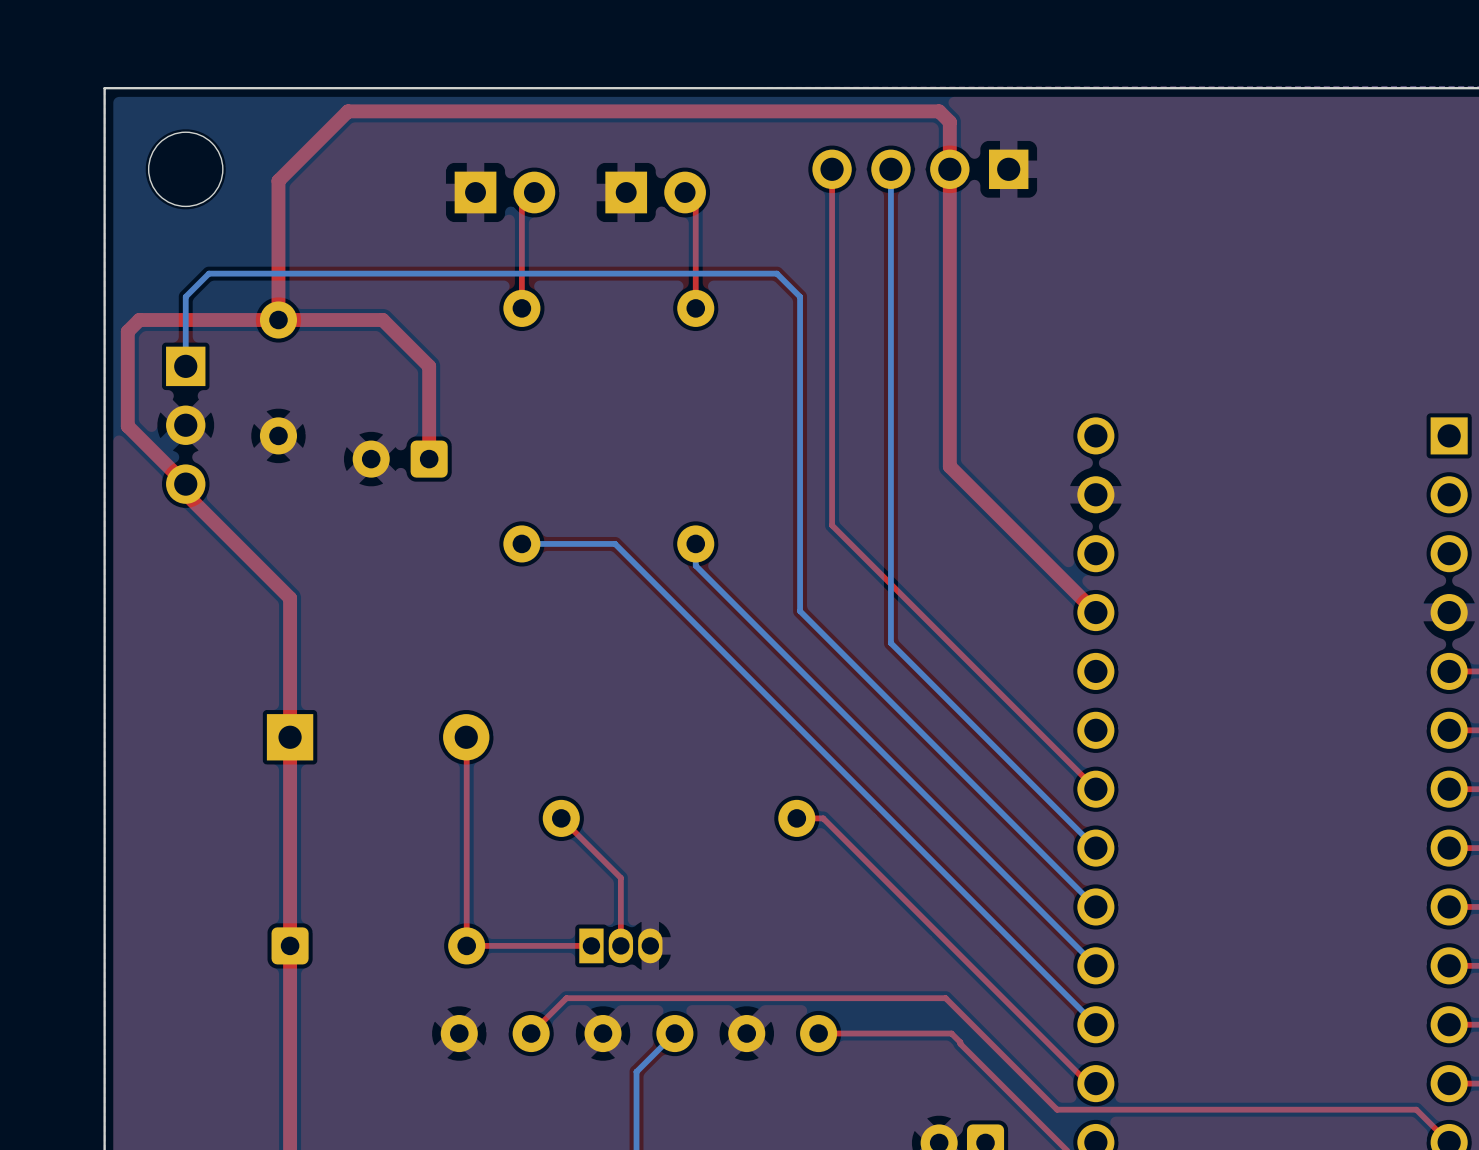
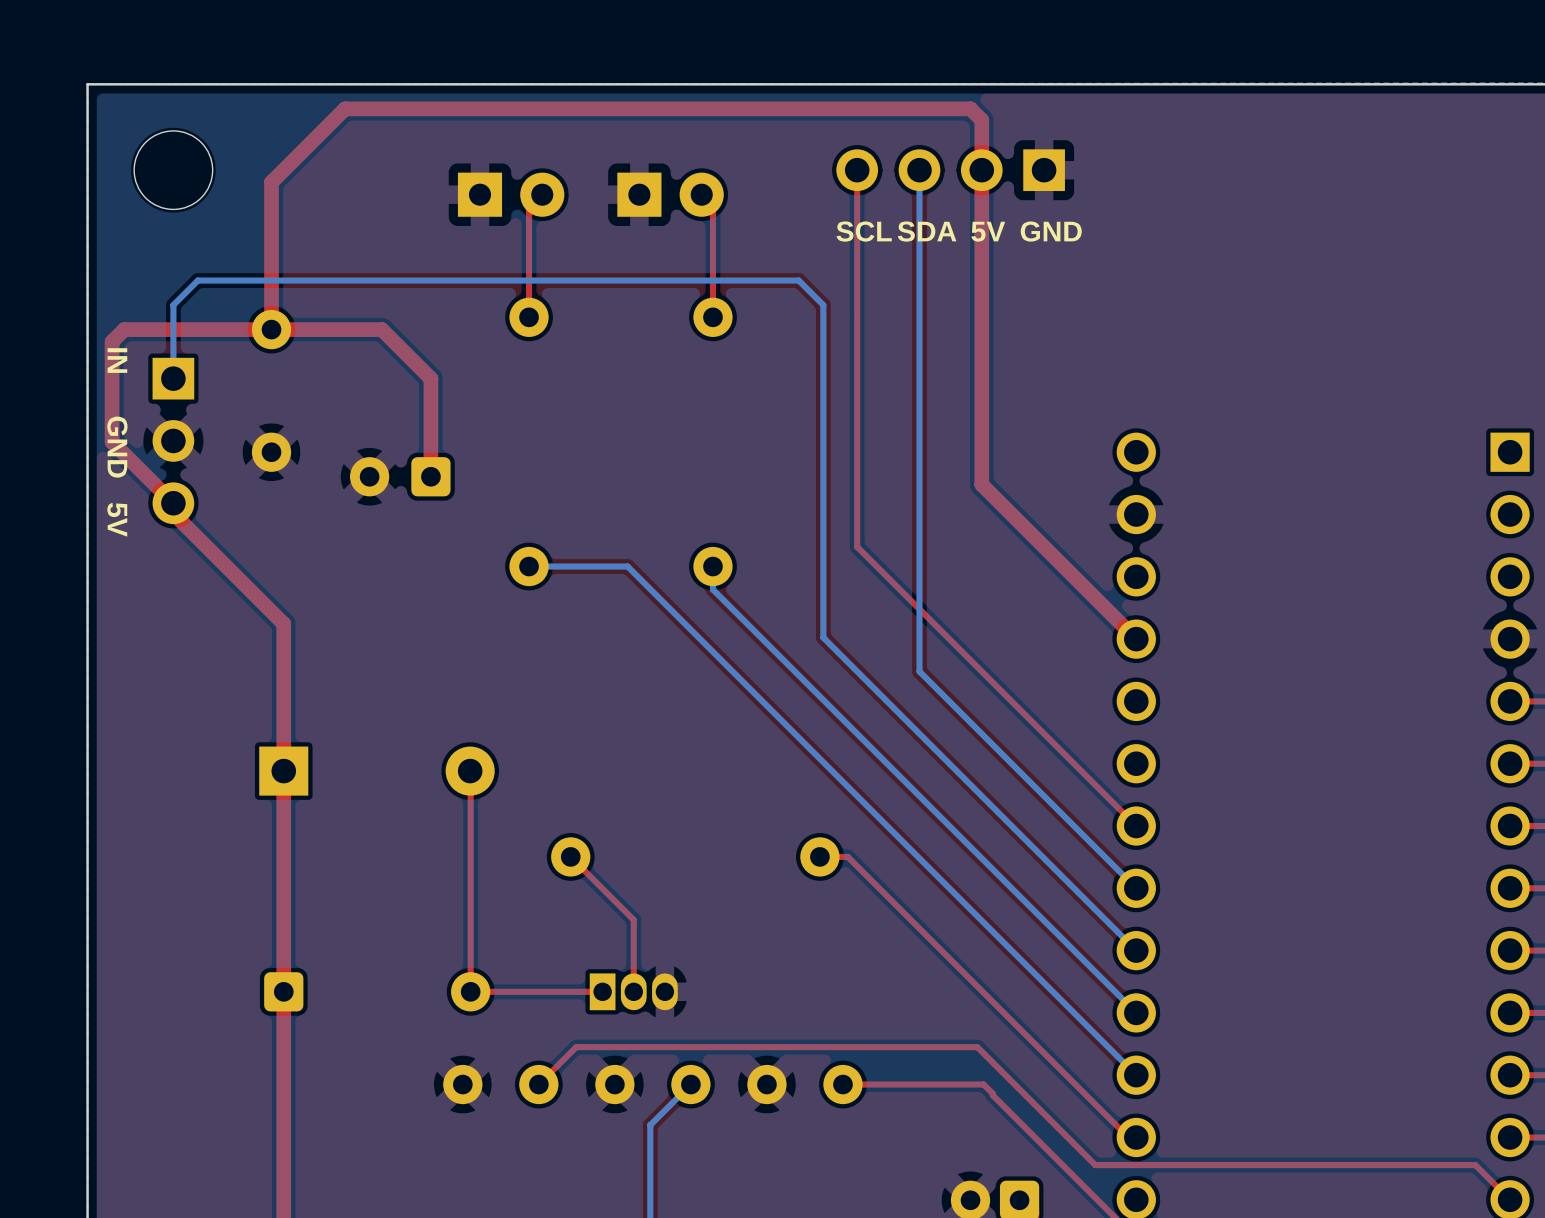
text: none -> SCL (864, 231)
text: none -> SDA (927, 231)
text: none -> 5V (988, 231)
text: none -> GND (1051, 231)
text: none -> IN (117, 360)
text: none -> GND (117, 447)
text: none -> 5V (117, 519)

